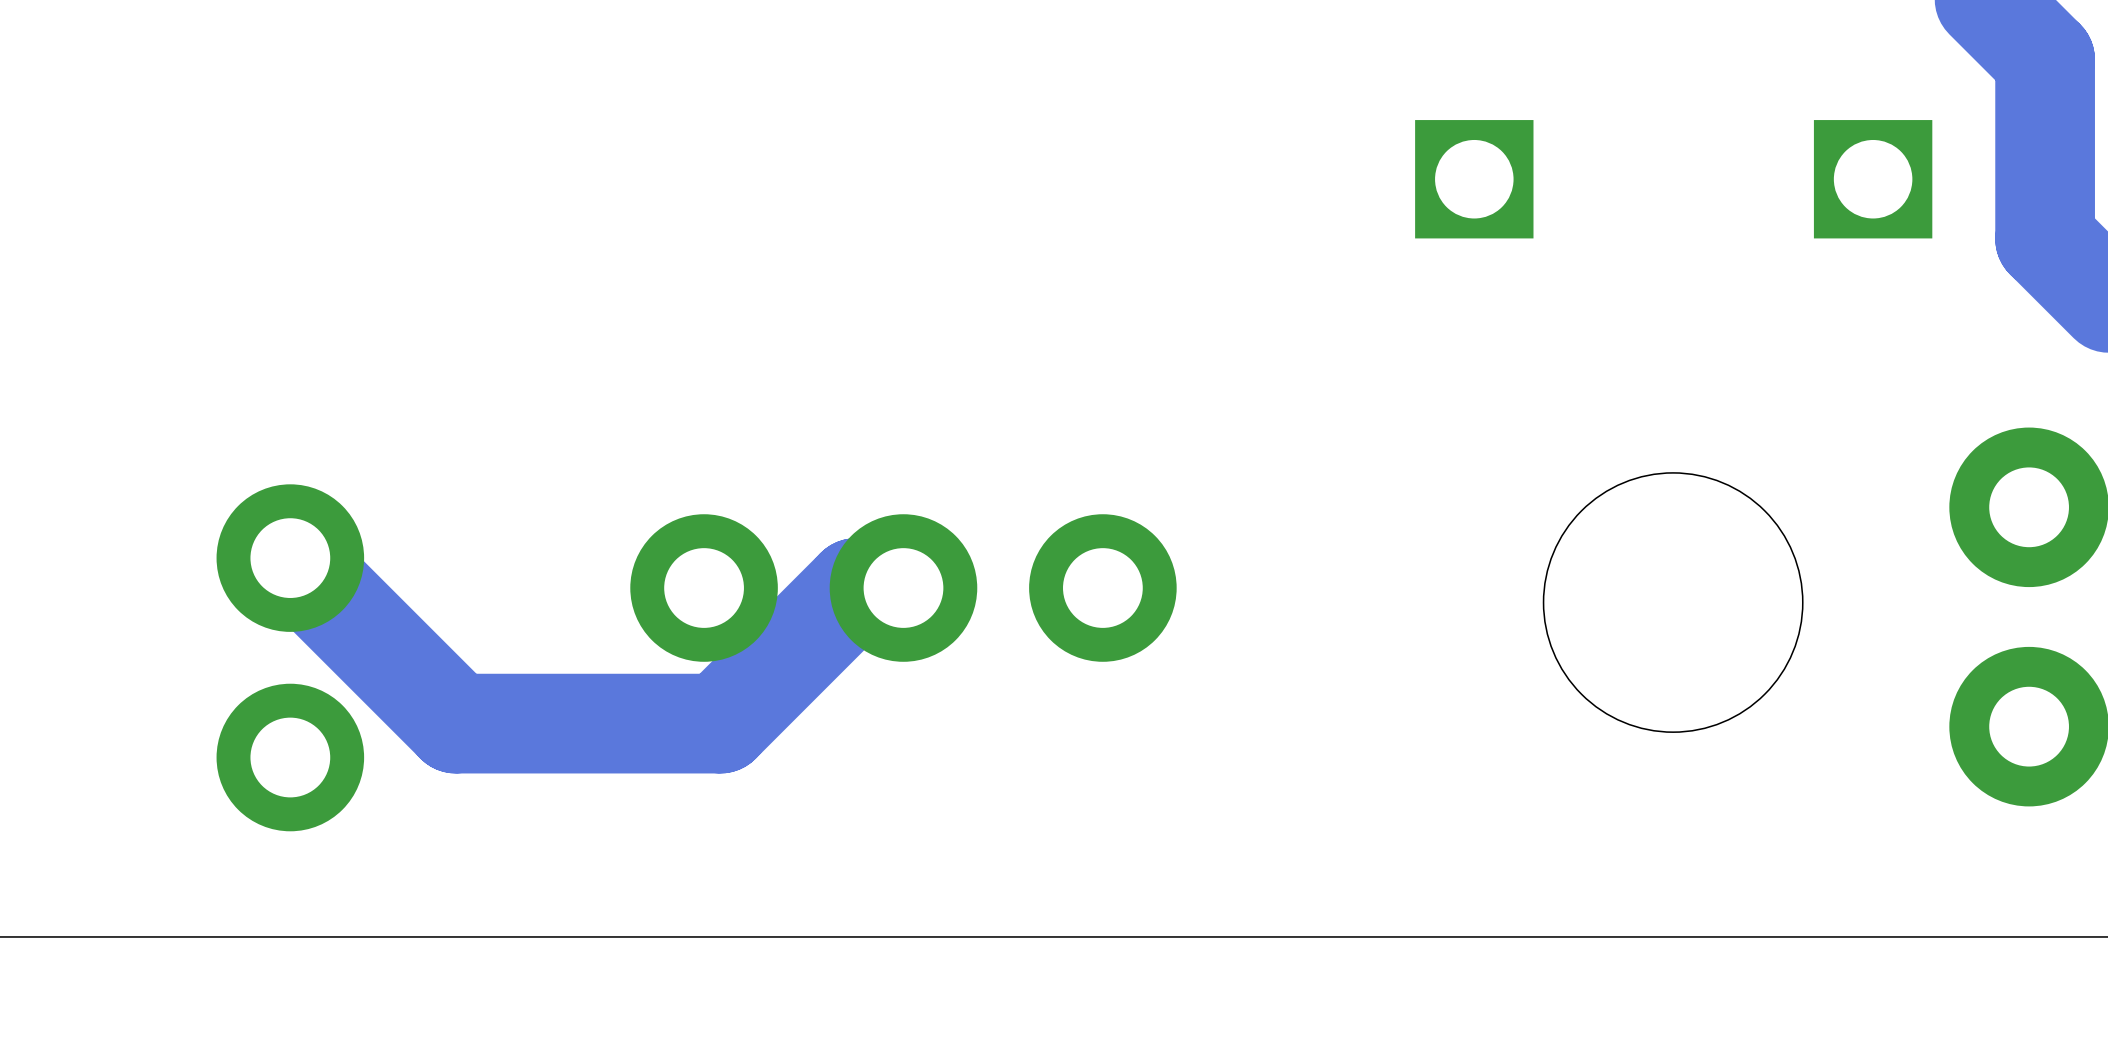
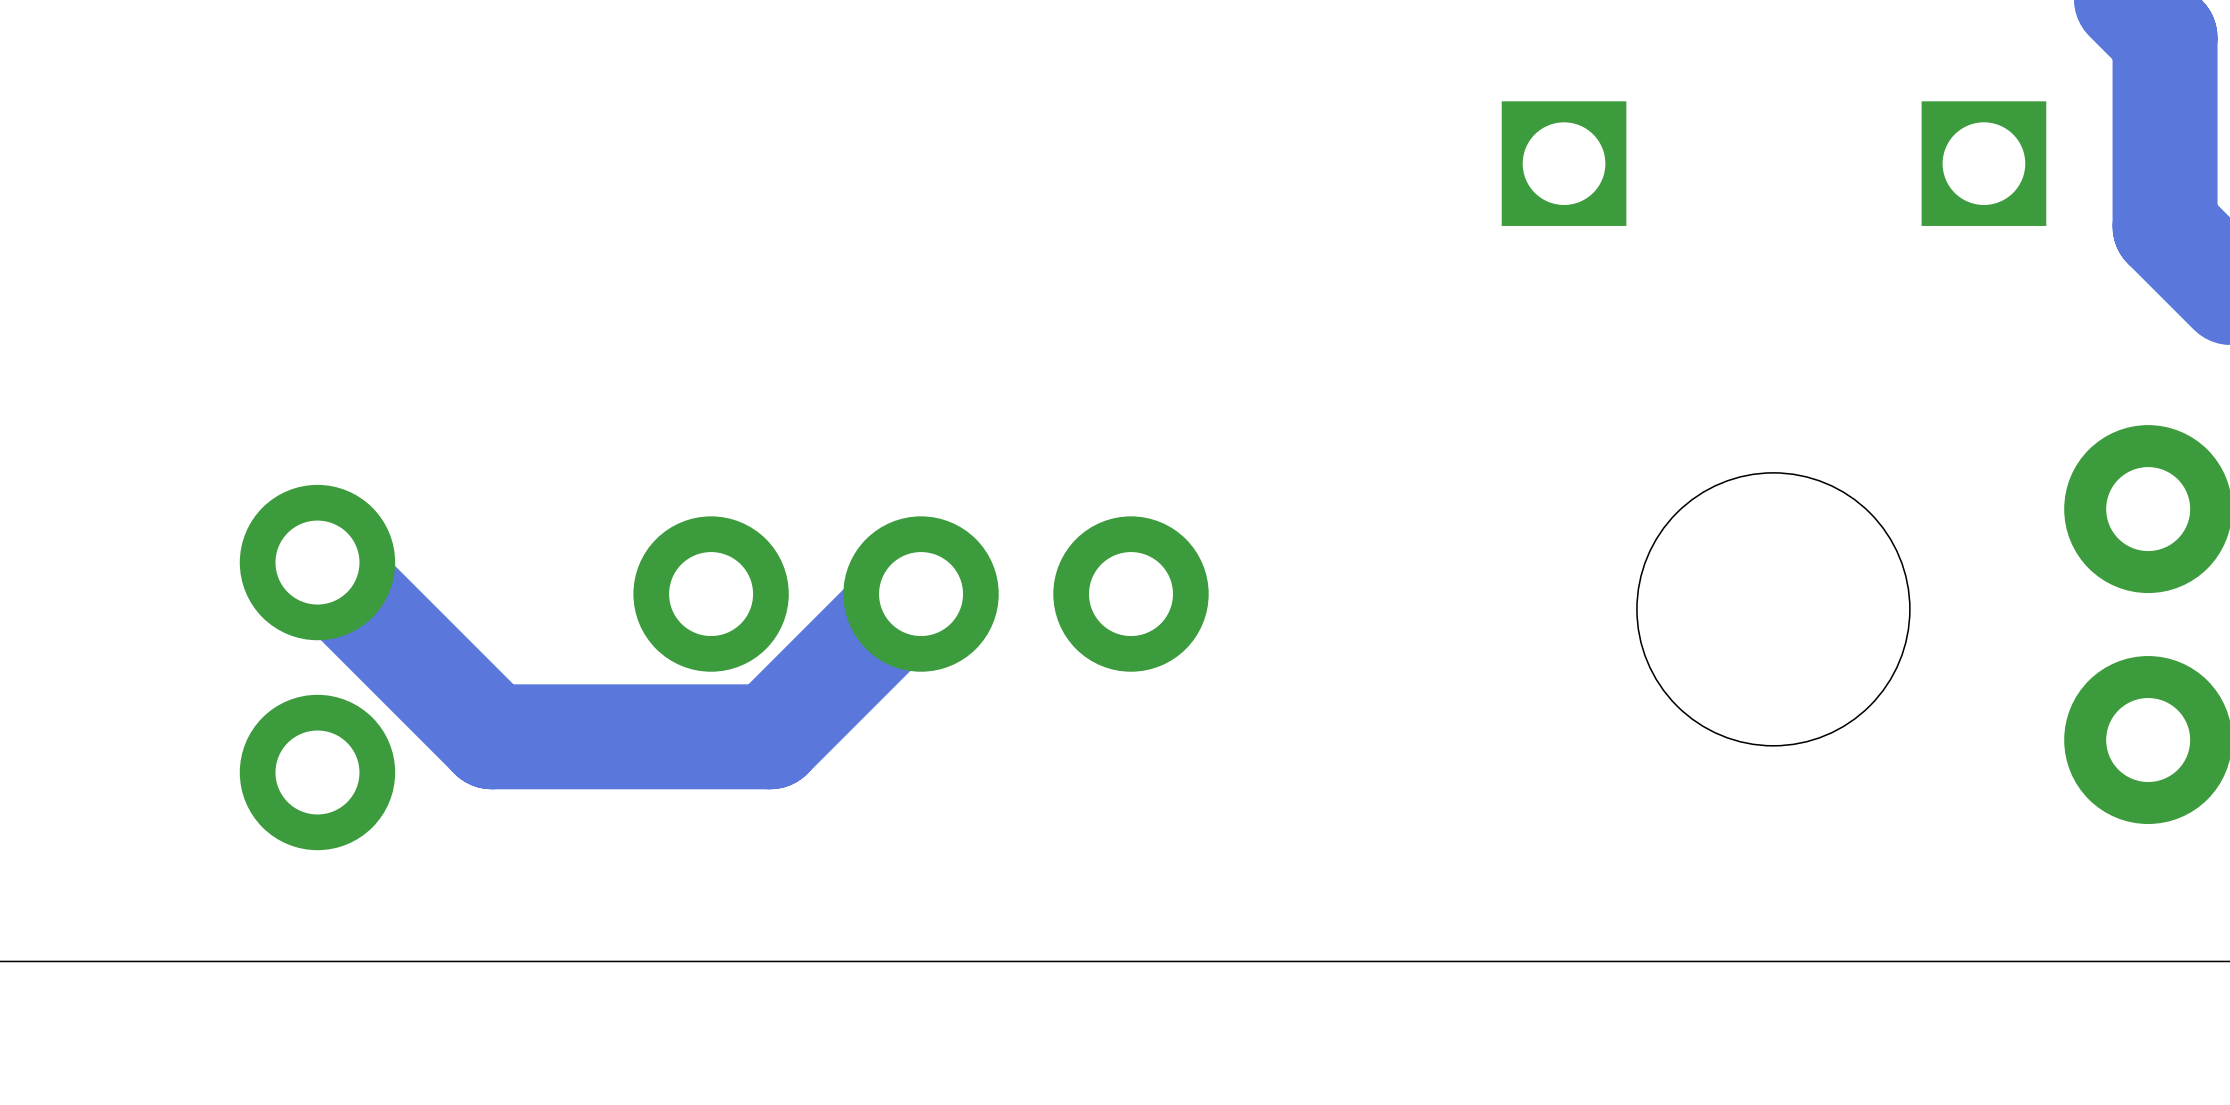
part position: (903, 588) -> (921, 594)

